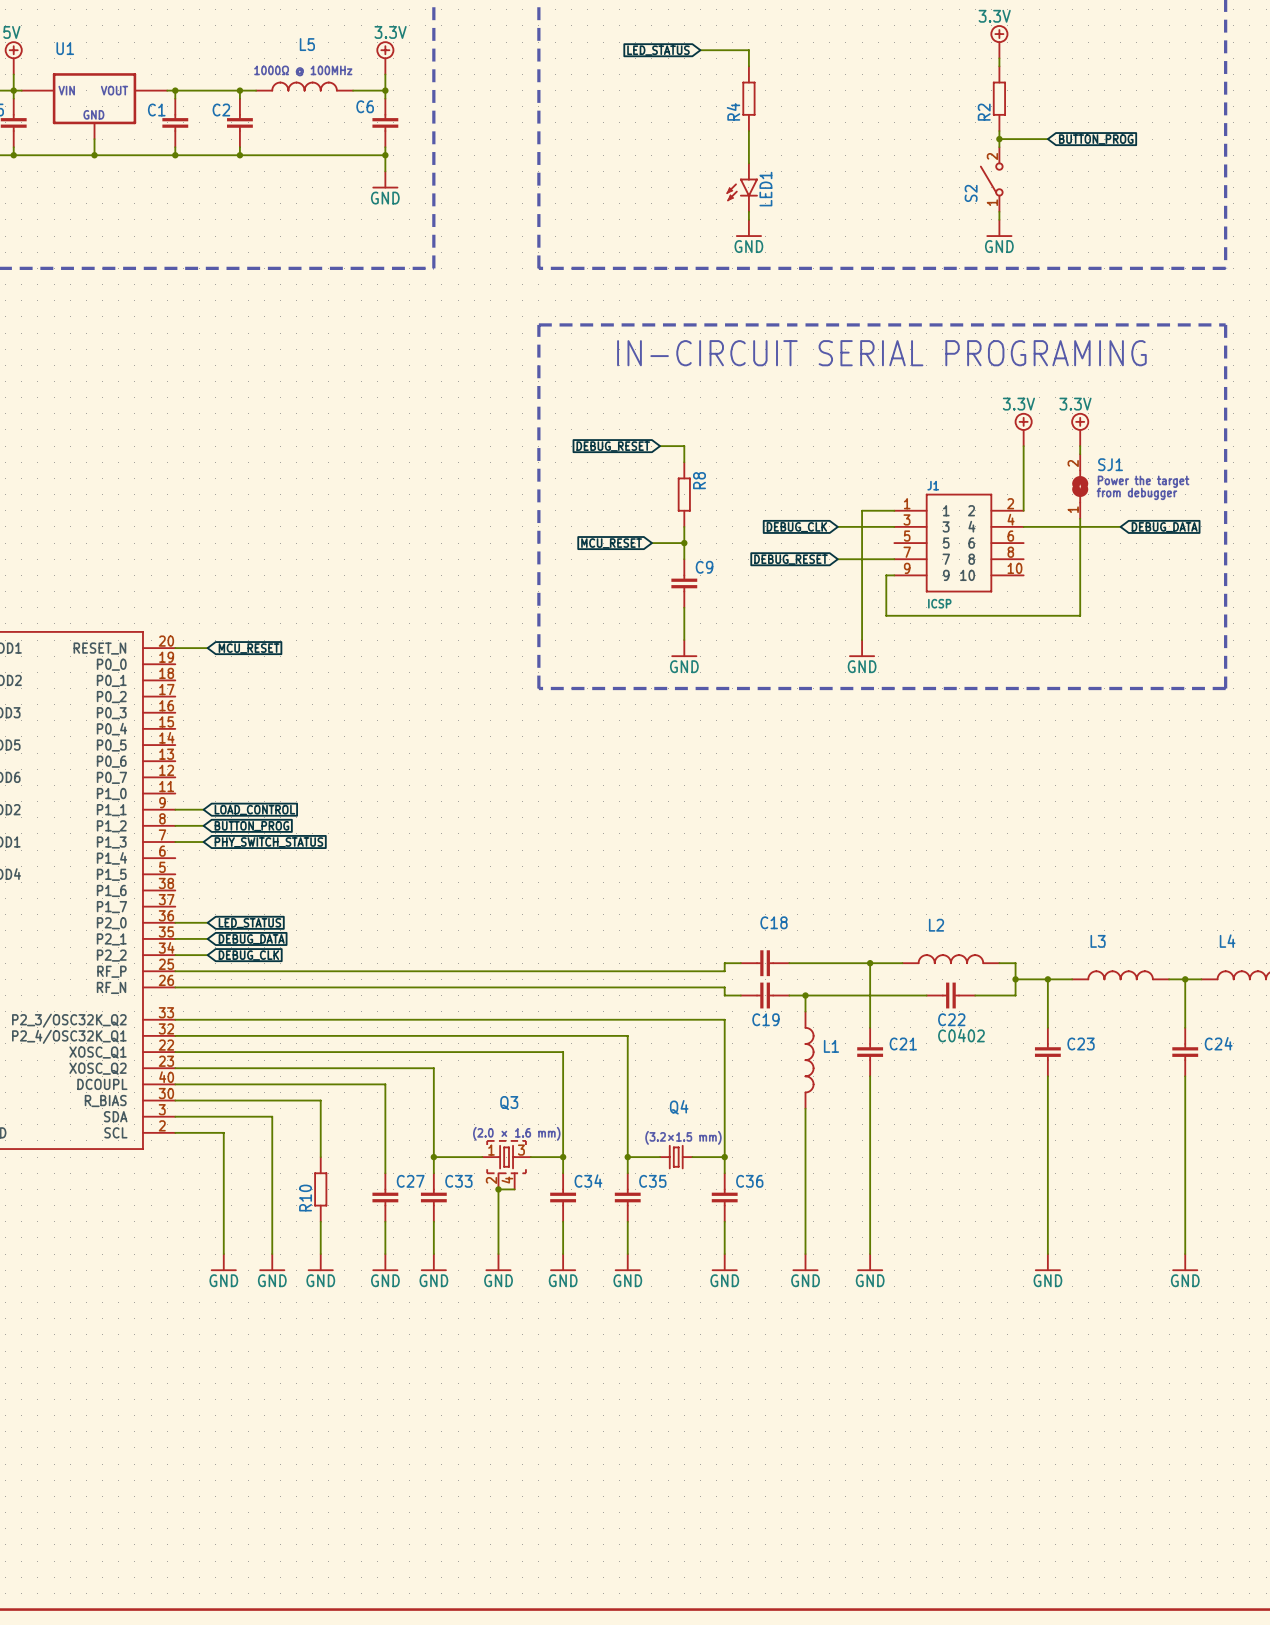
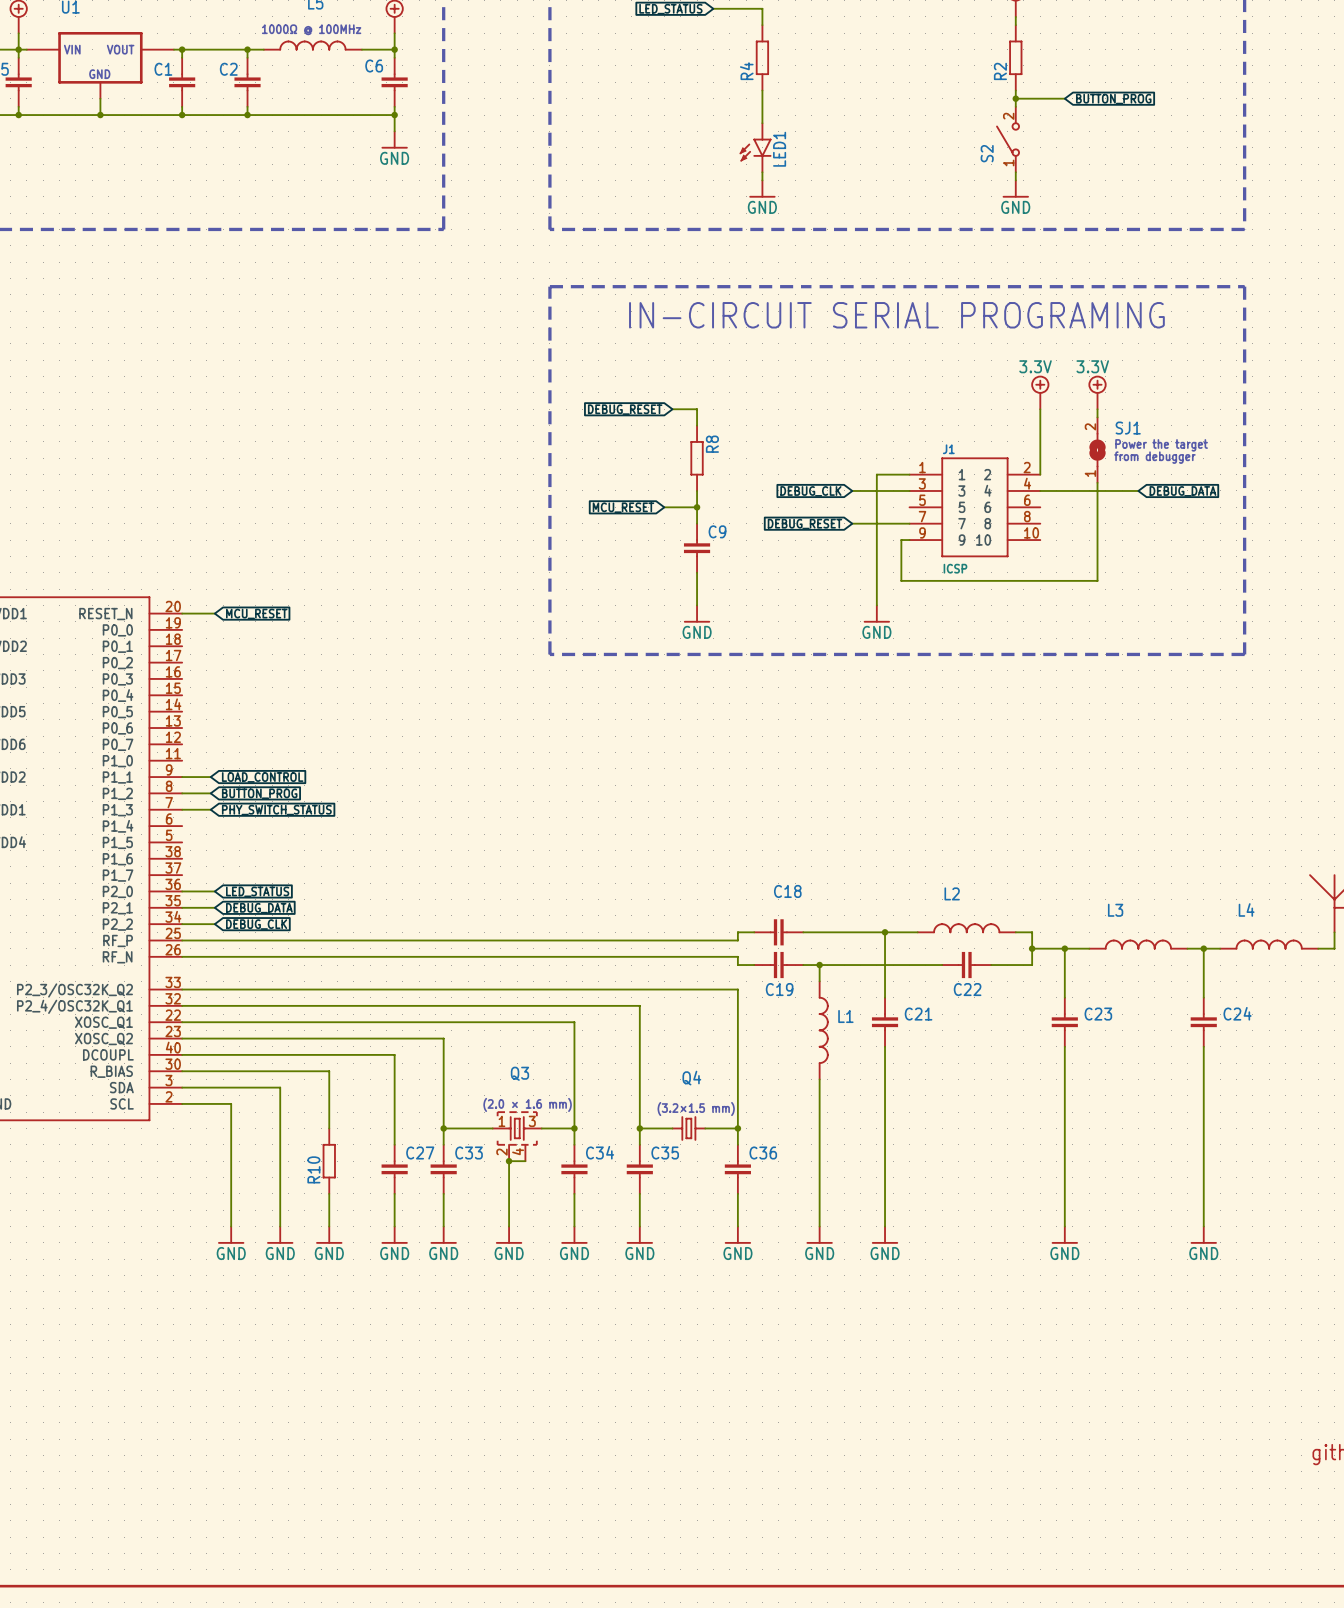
C22 value: C0402 (961, 1035) -> none

